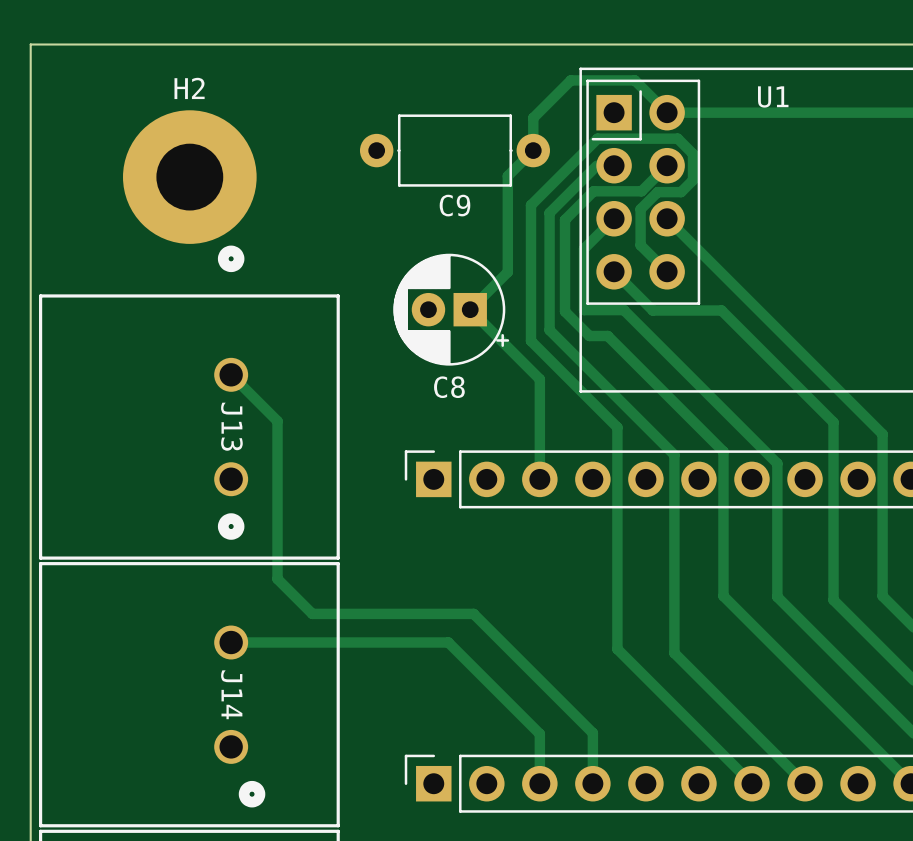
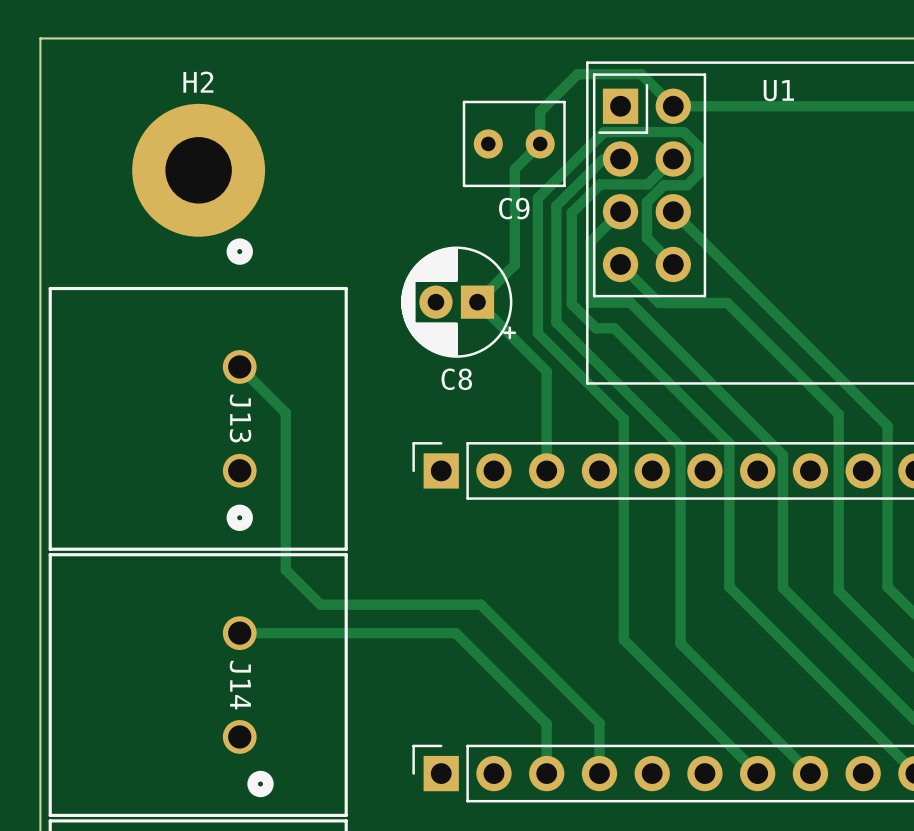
C9 footprint: [359, 114, 550, 187] -> [462, 100, 566, 188]

